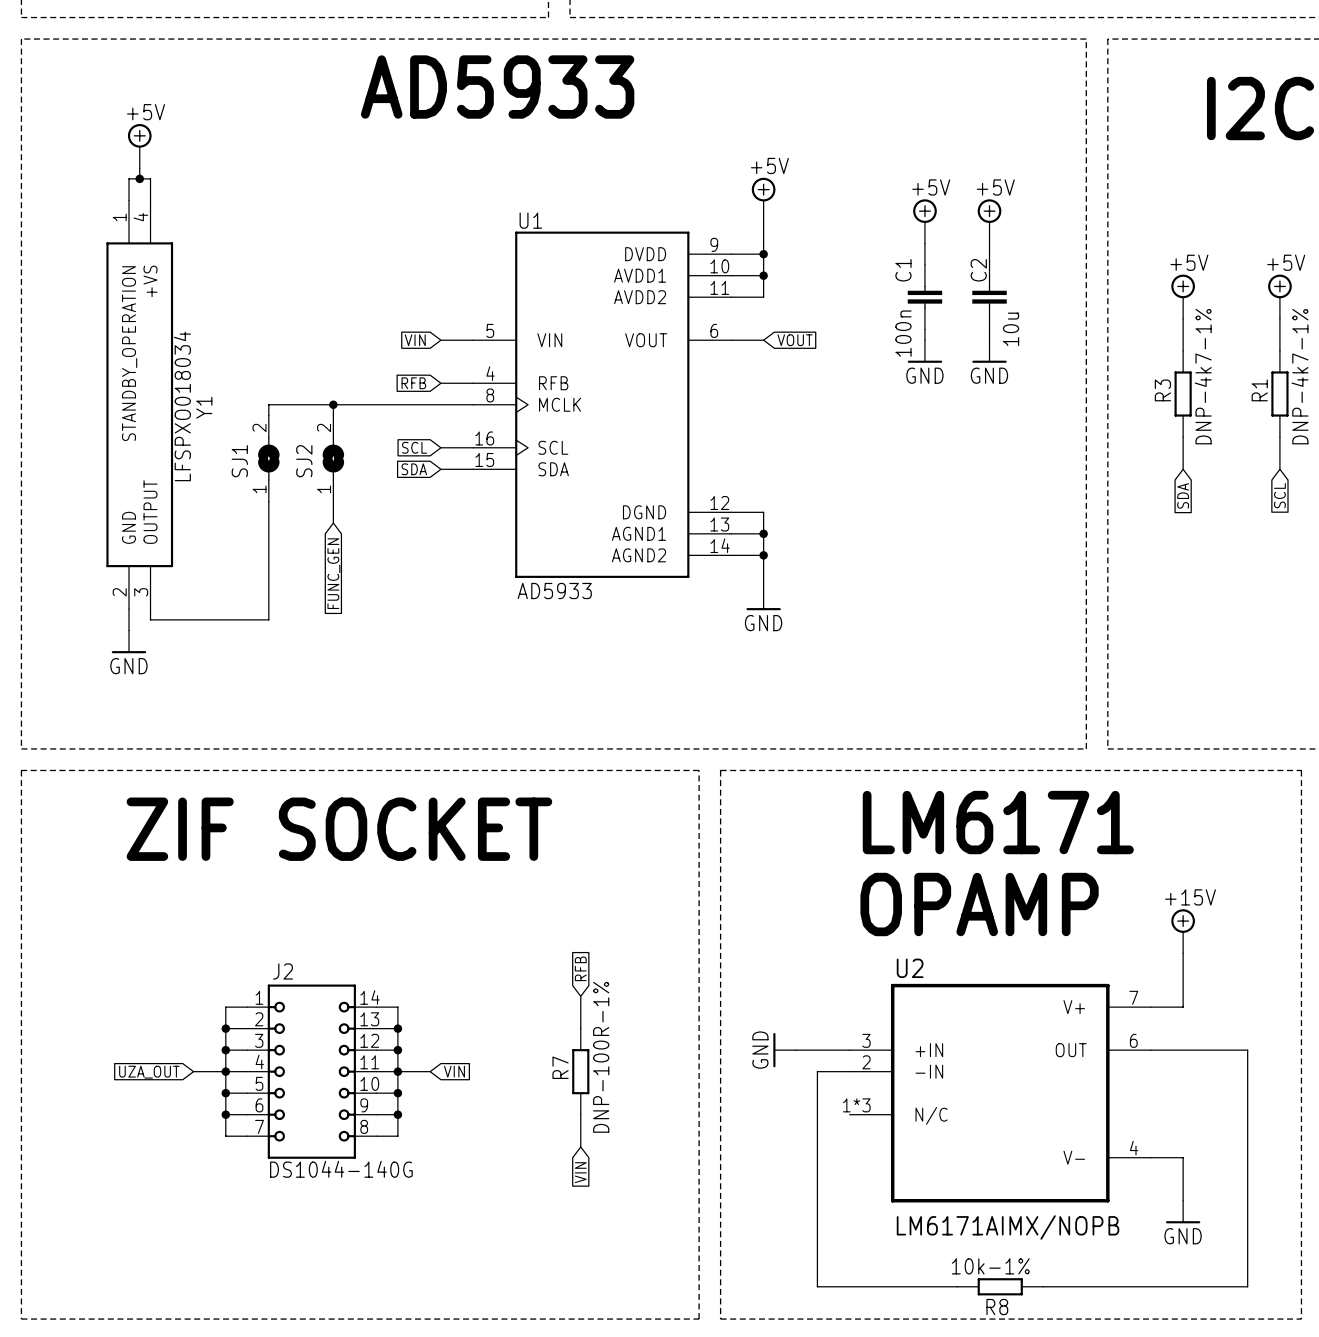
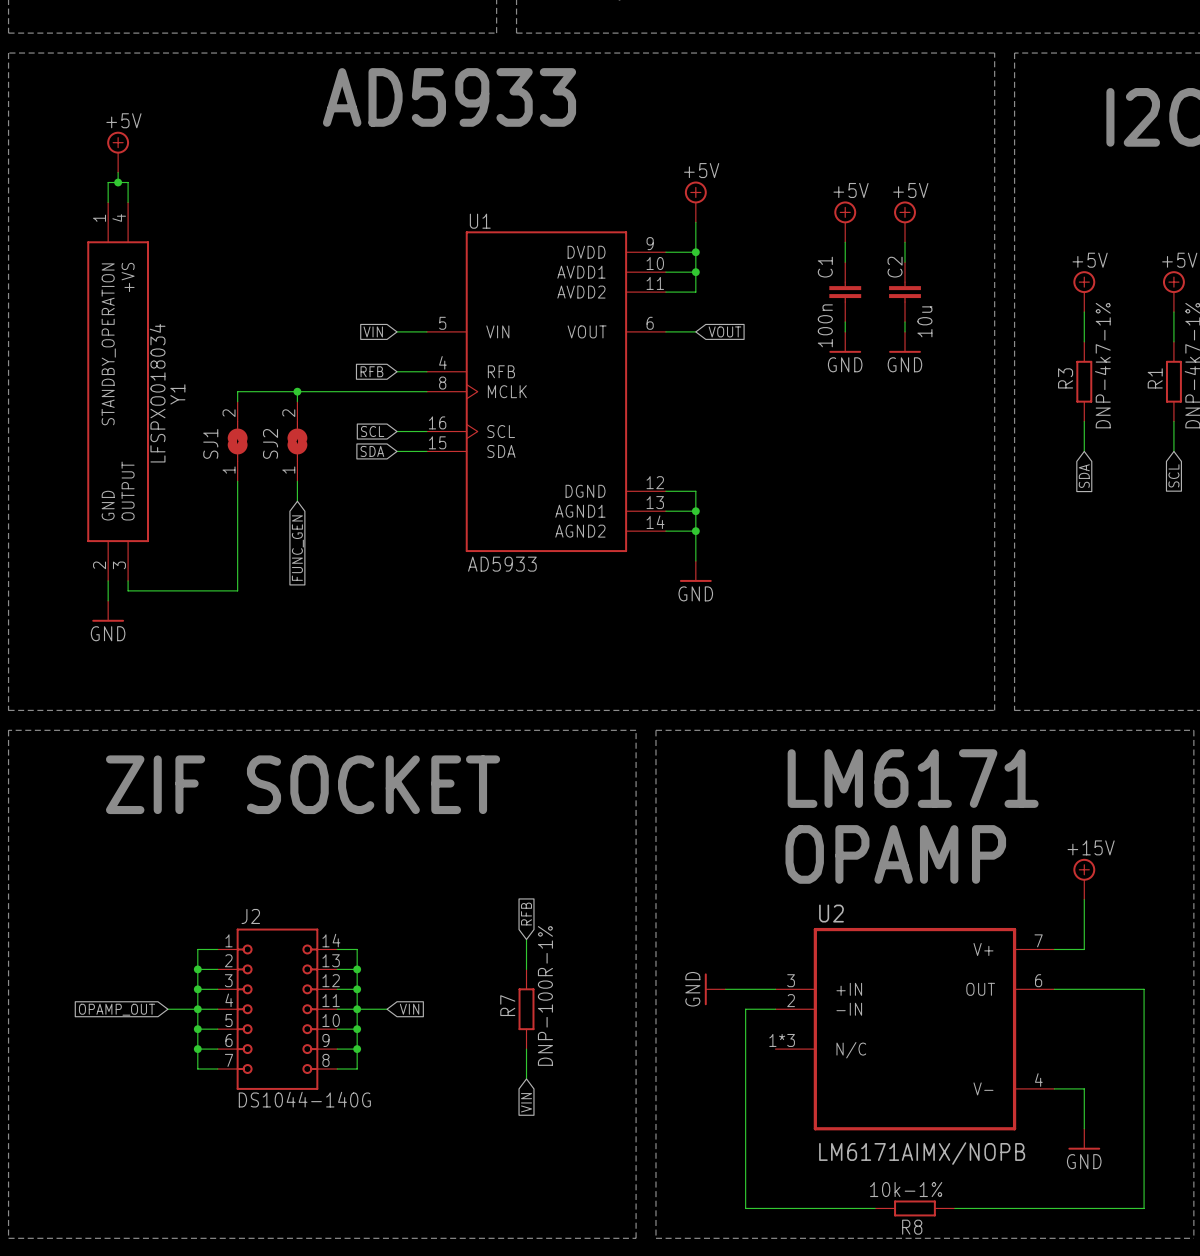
global label: UZA_OUT (149, 1072) -> OPAMP_OUT (117, 1009)

